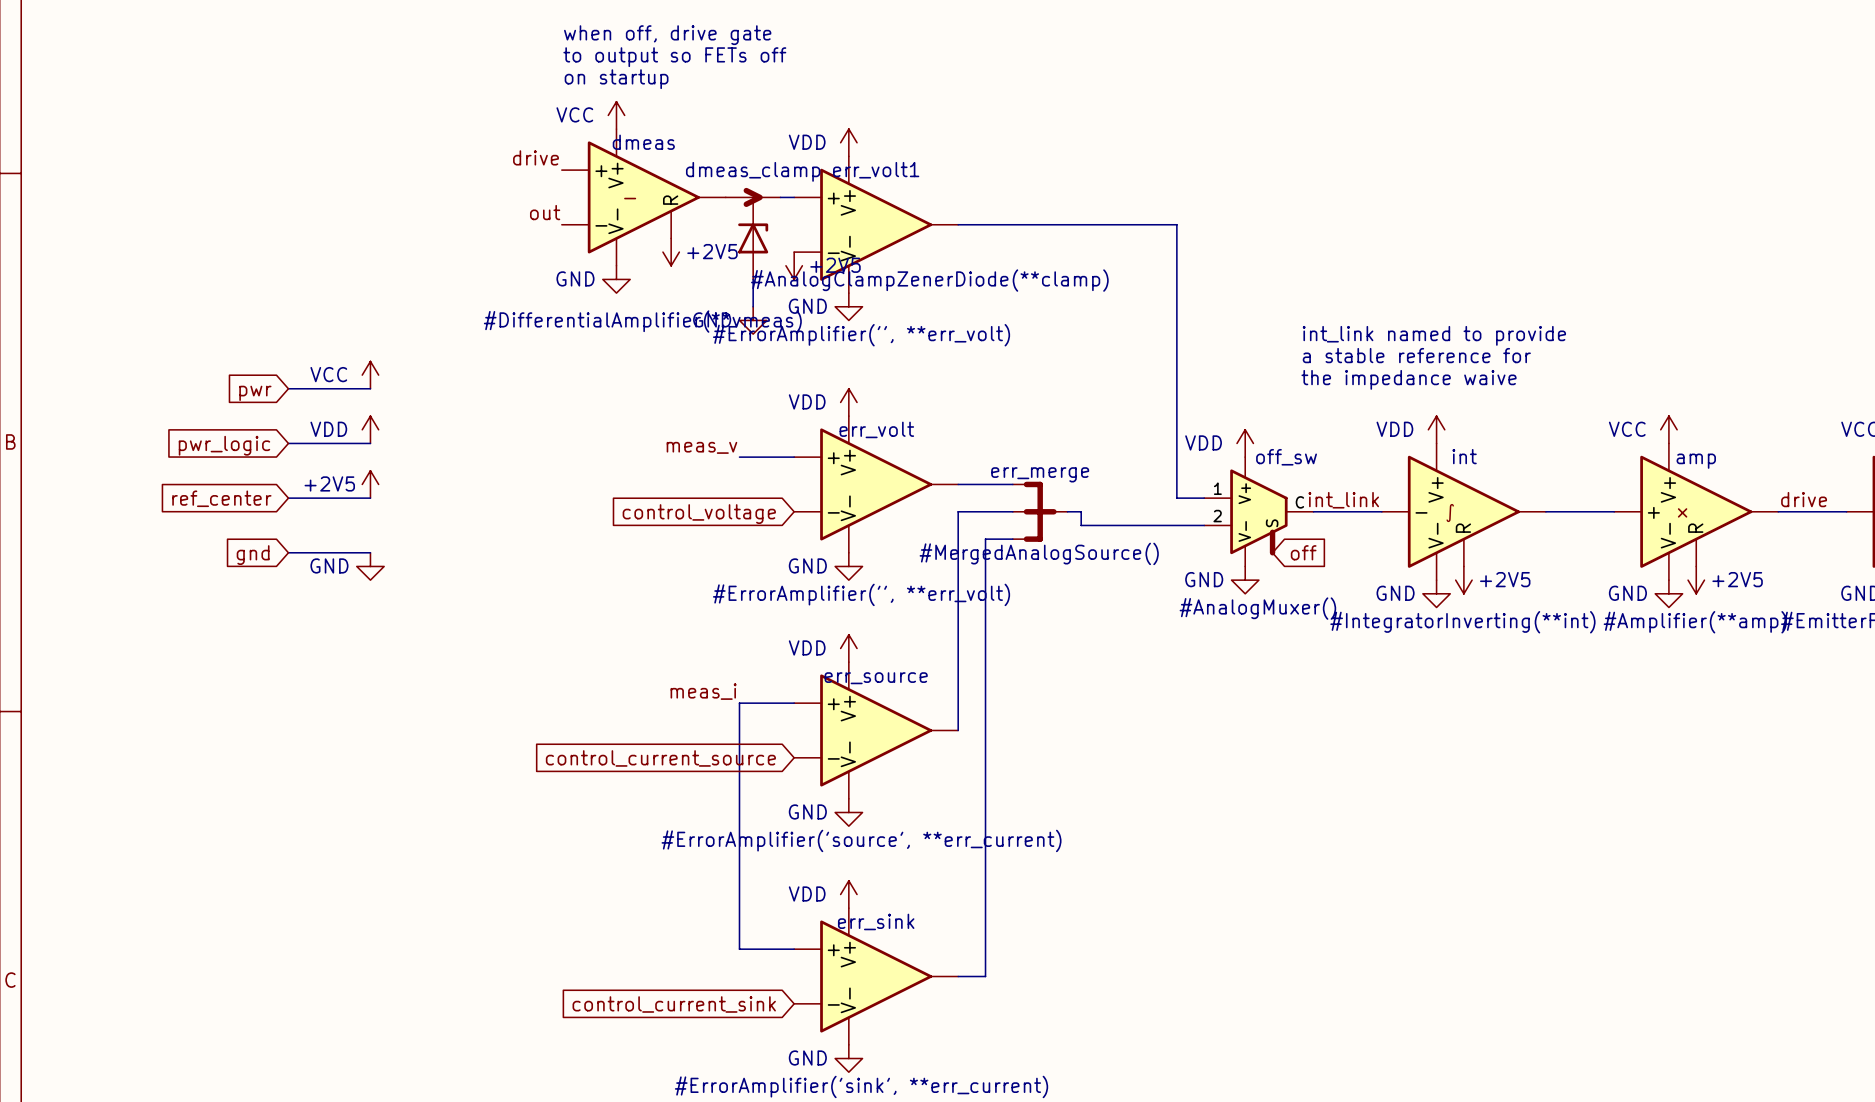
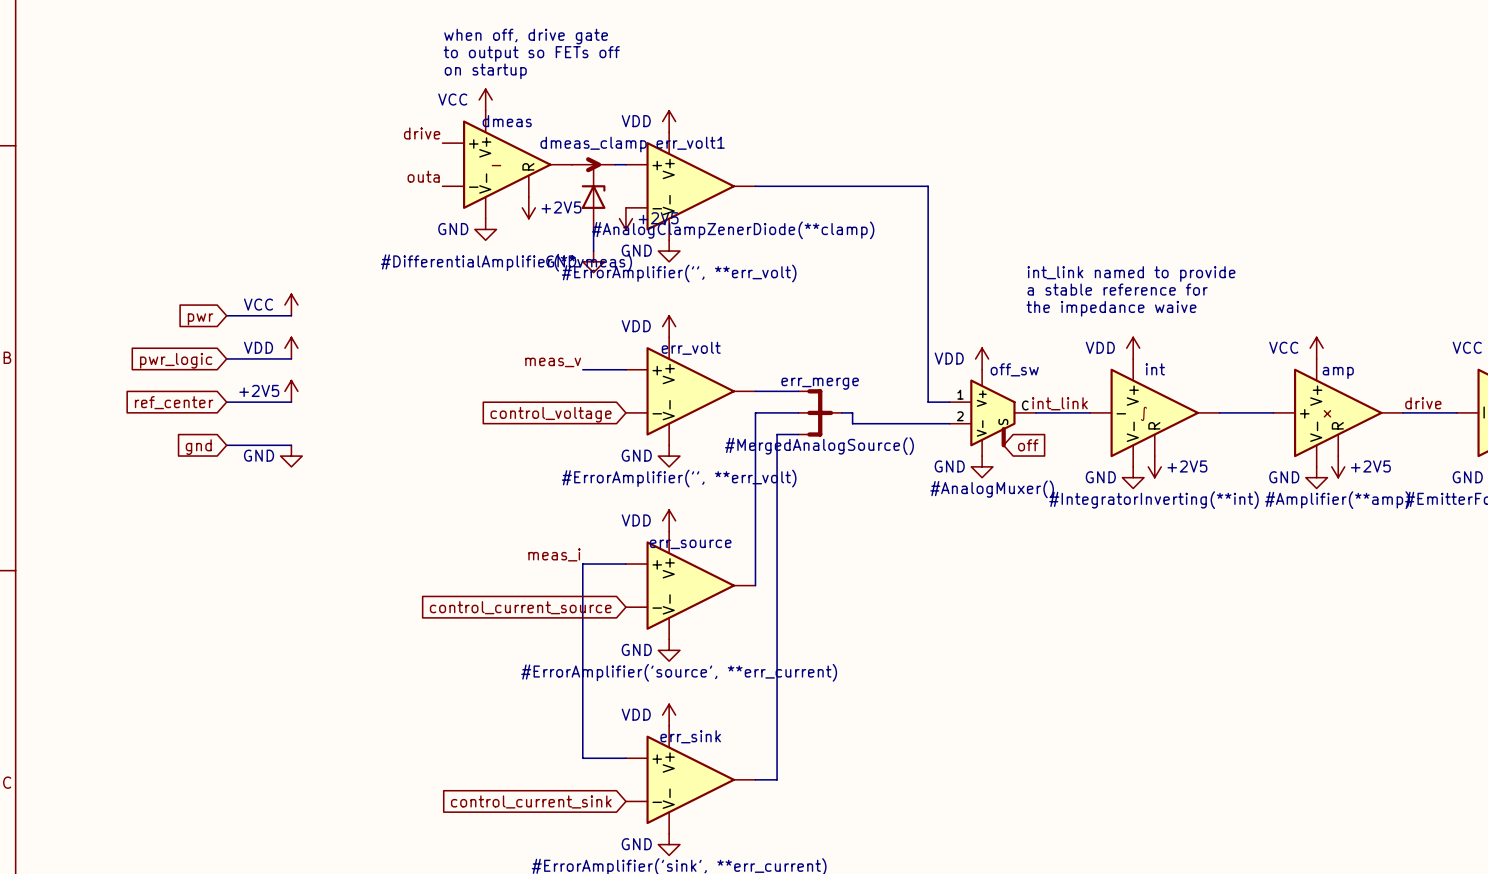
label: out (545, 212) -> outa (423, 176)

